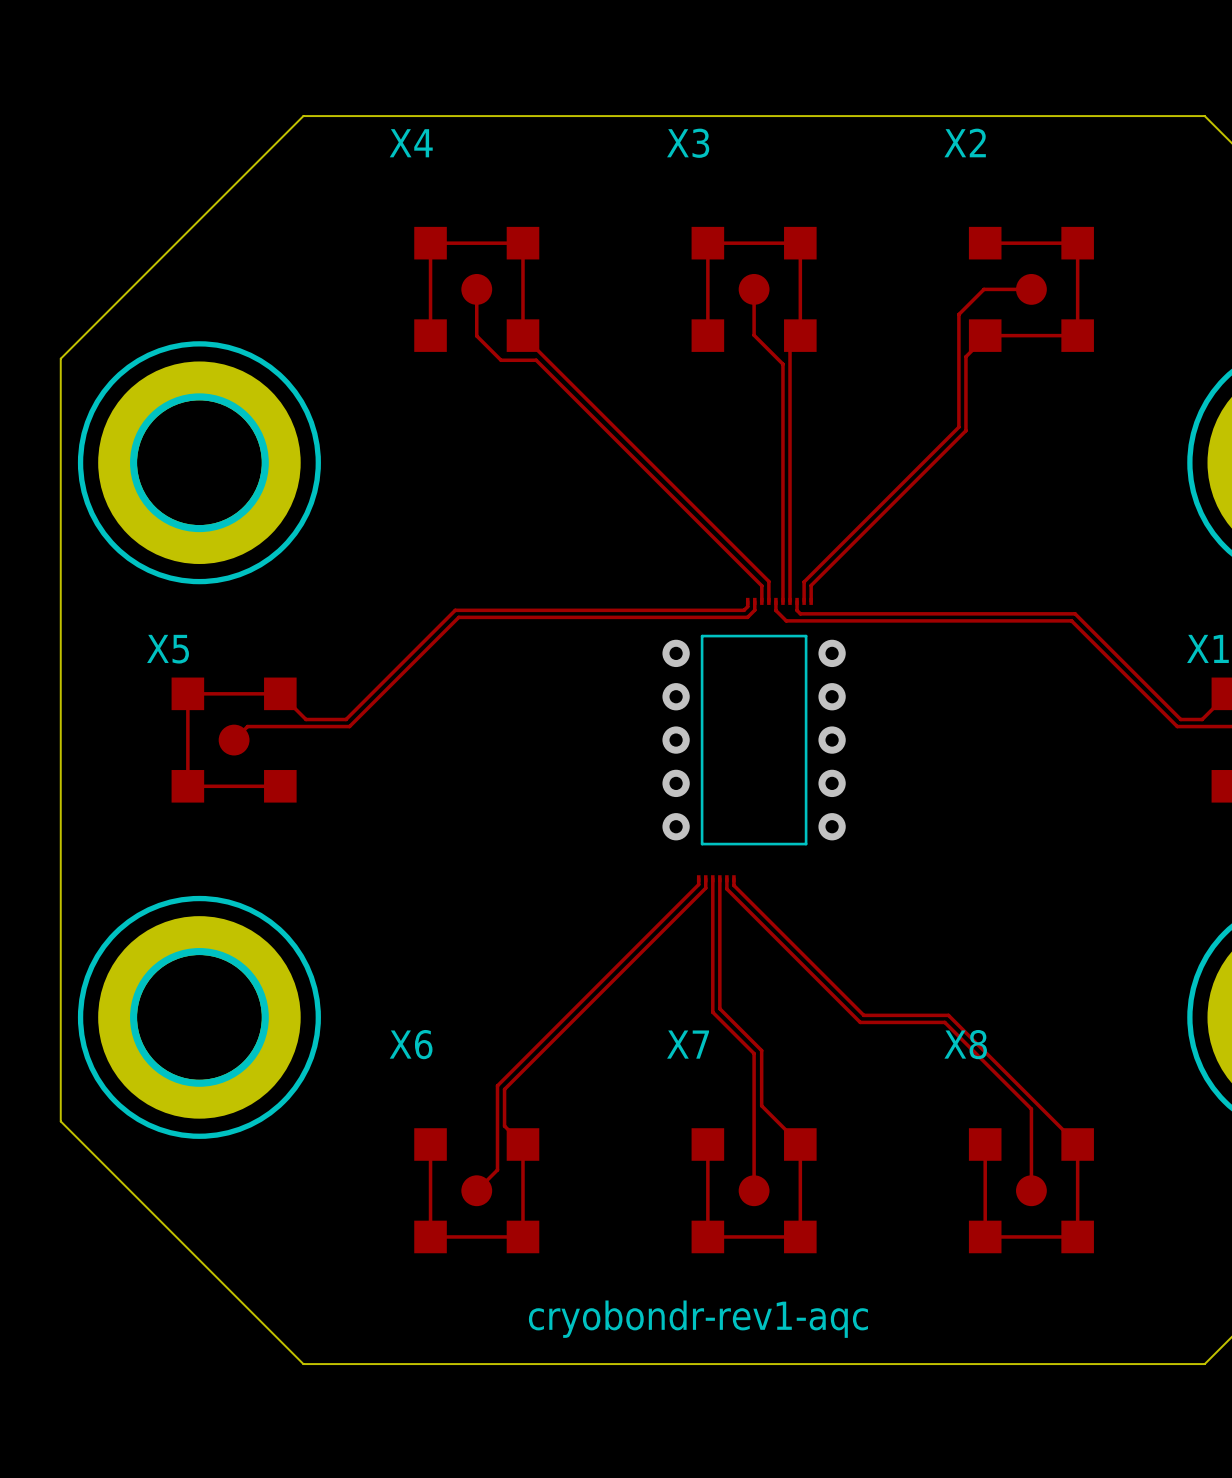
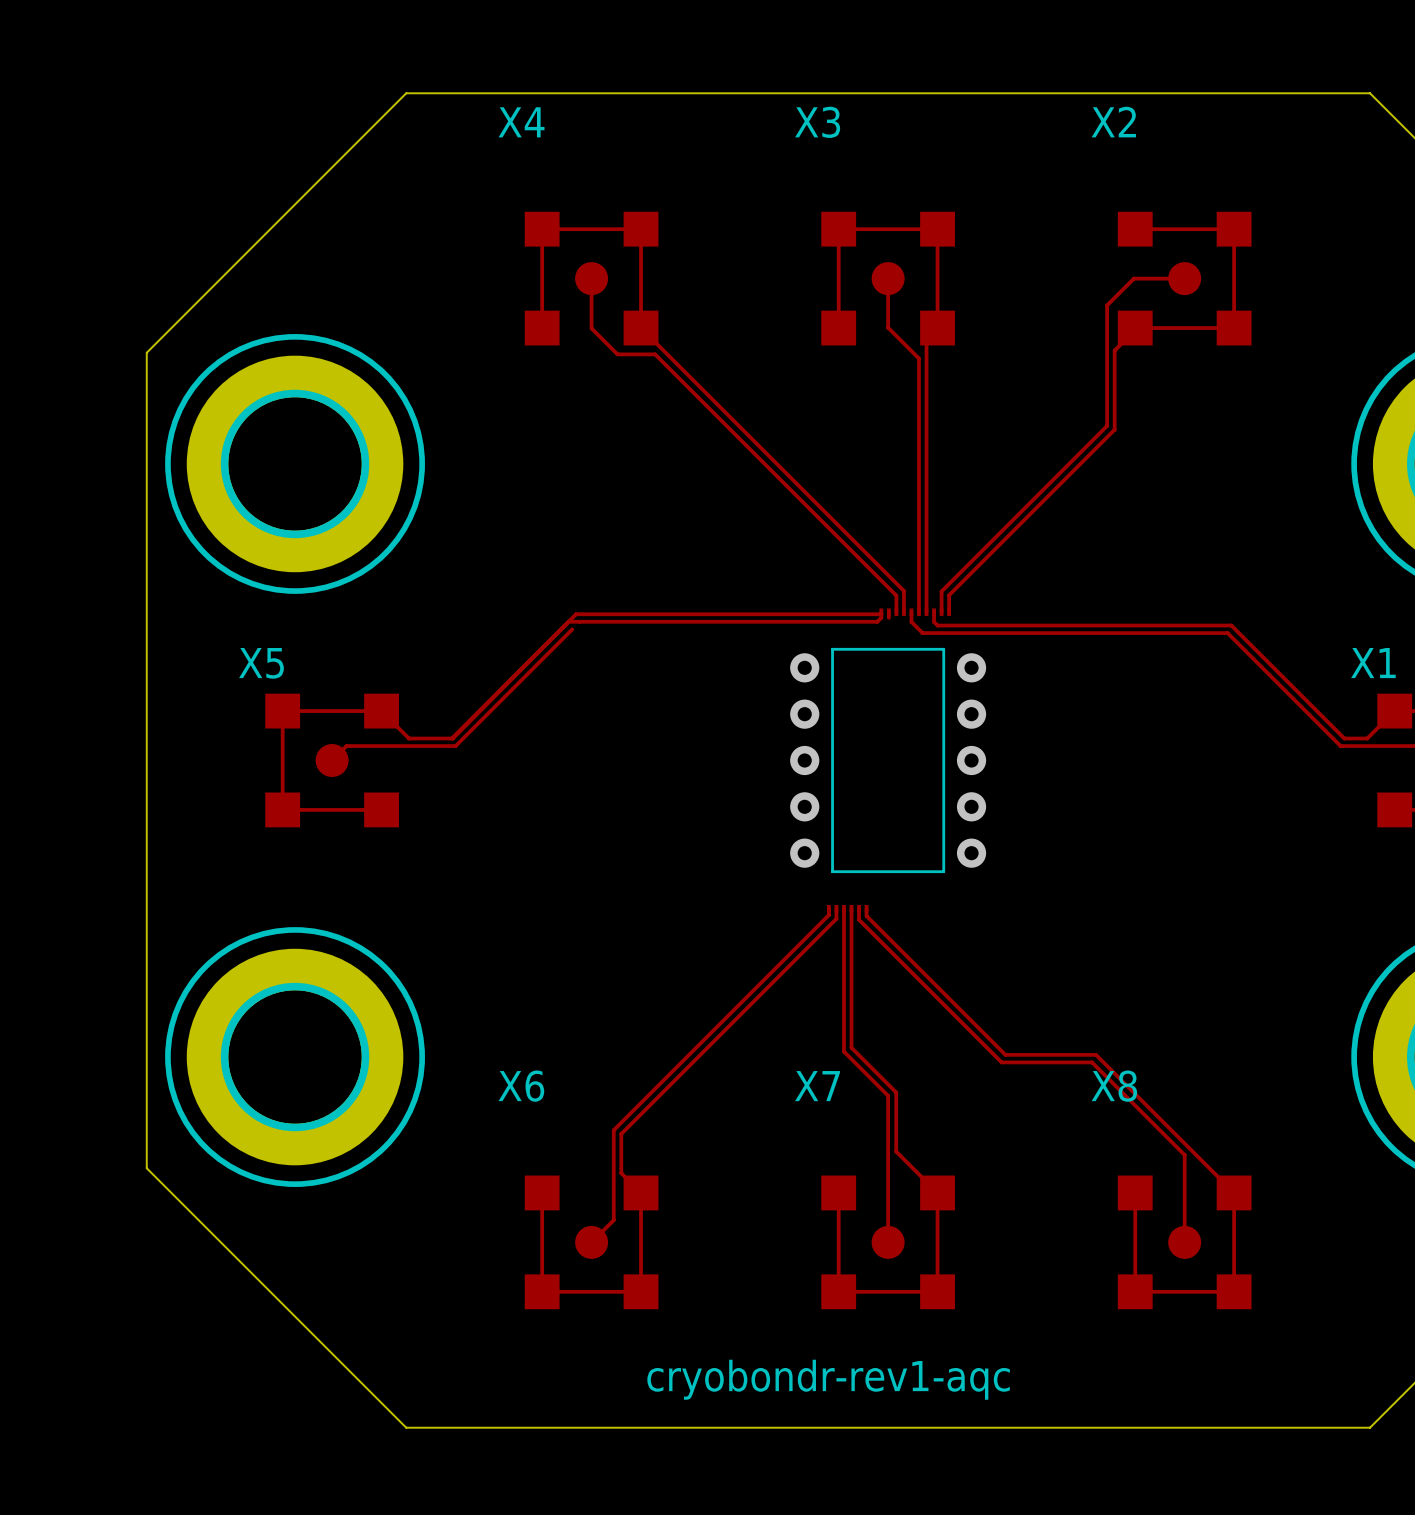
track: none -> (881, 614) (576, 614) (451, 738)
track: (754, 606) (754, 610) (747, 617) (458, 617) -> none

